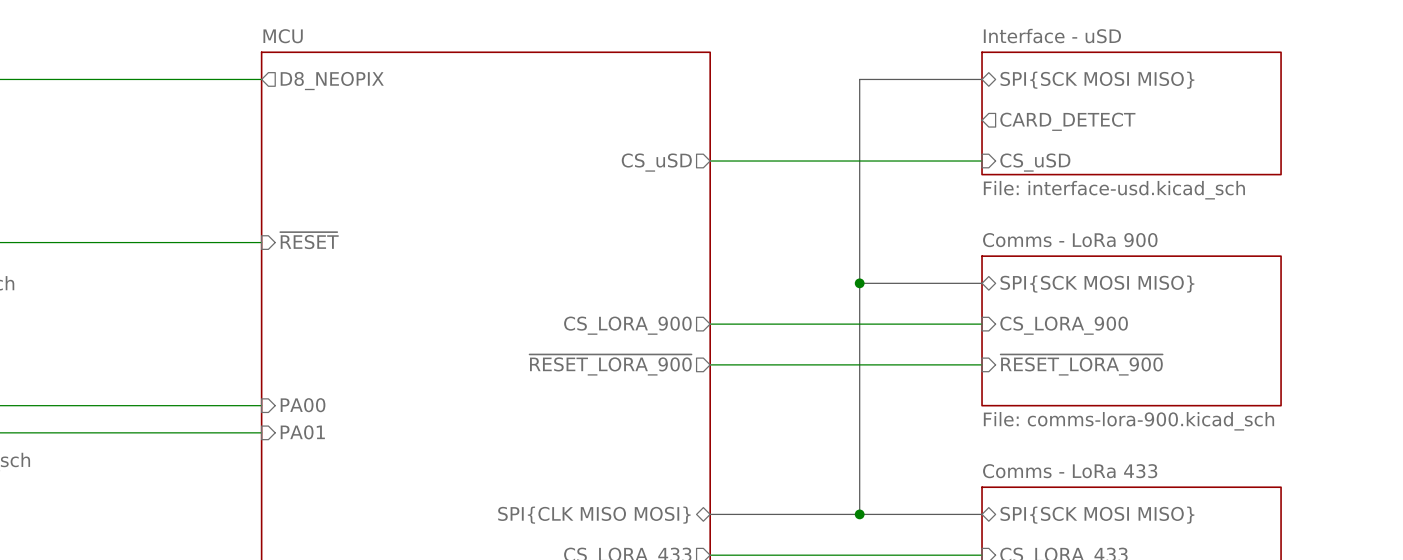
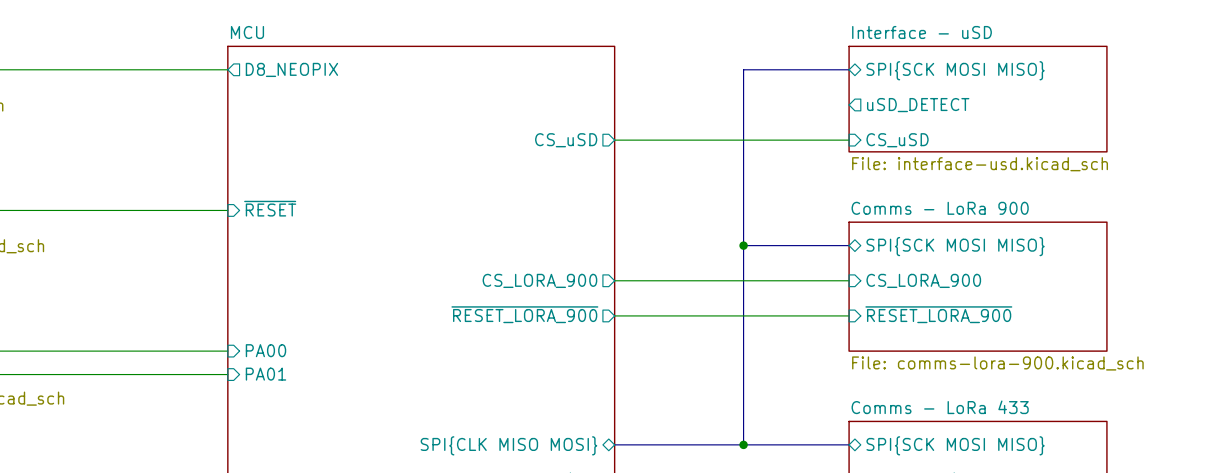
sheet pin: CARD_DETECT (1067, 121) -> uSD_DETECT (918, 105)

